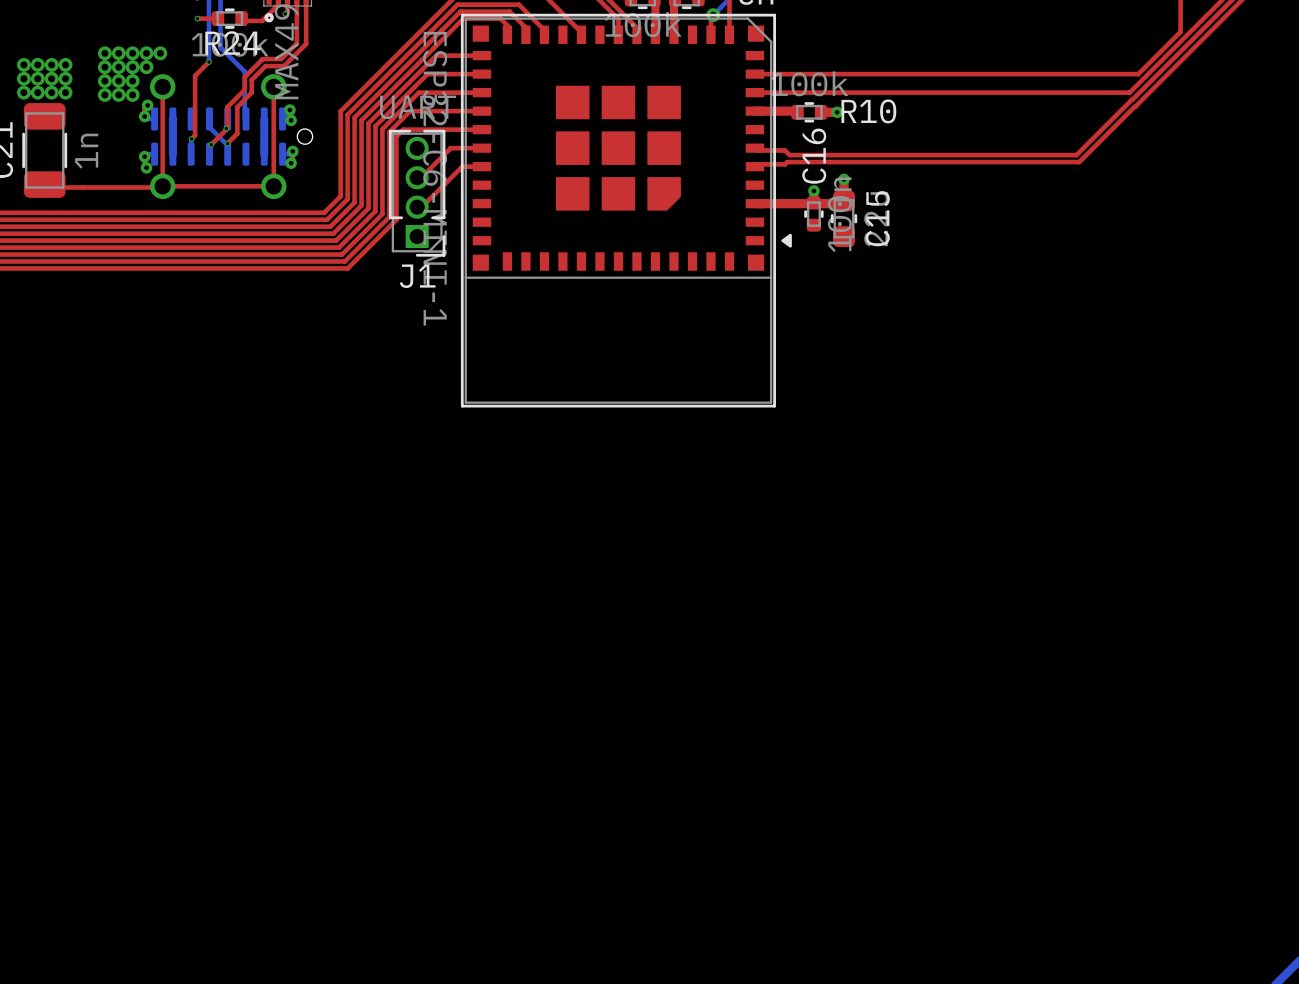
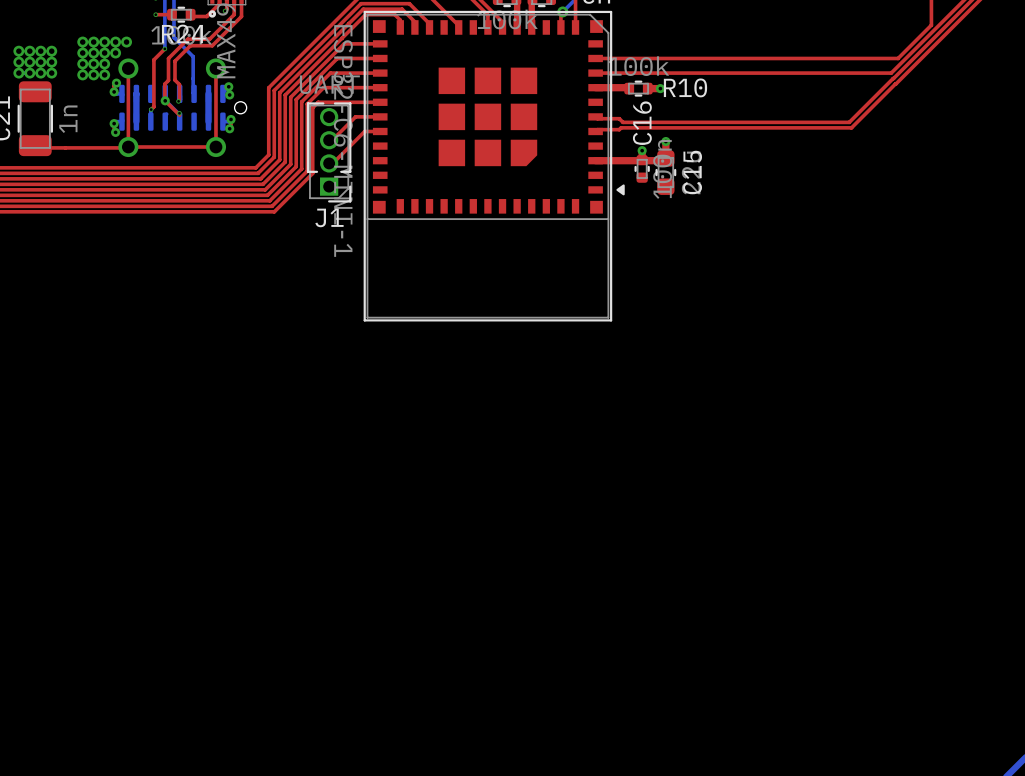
top track: (296, 18) (296, 43) (281, 59) (262, 59) (244, 77) (244, 89) (227, 107) -> (241, 16) (212, 45) (190, 45) (175, 61) (175, 80) (179, 84)
top track: none -> (234, 14) (209, 39) (187, 39) (168, 58) (168, 80) (164, 84) (164, 100) (179, 115)
top track: (306, 20) (306, 44) (284, 66) (265, 66) (251, 79) (251, 92) (237, 107) (237, 133) (227, 143) -> none
via: none -> (165, 100)
top track: (227, 127) (211, 144) -> none
via: (211, 144) -> none

